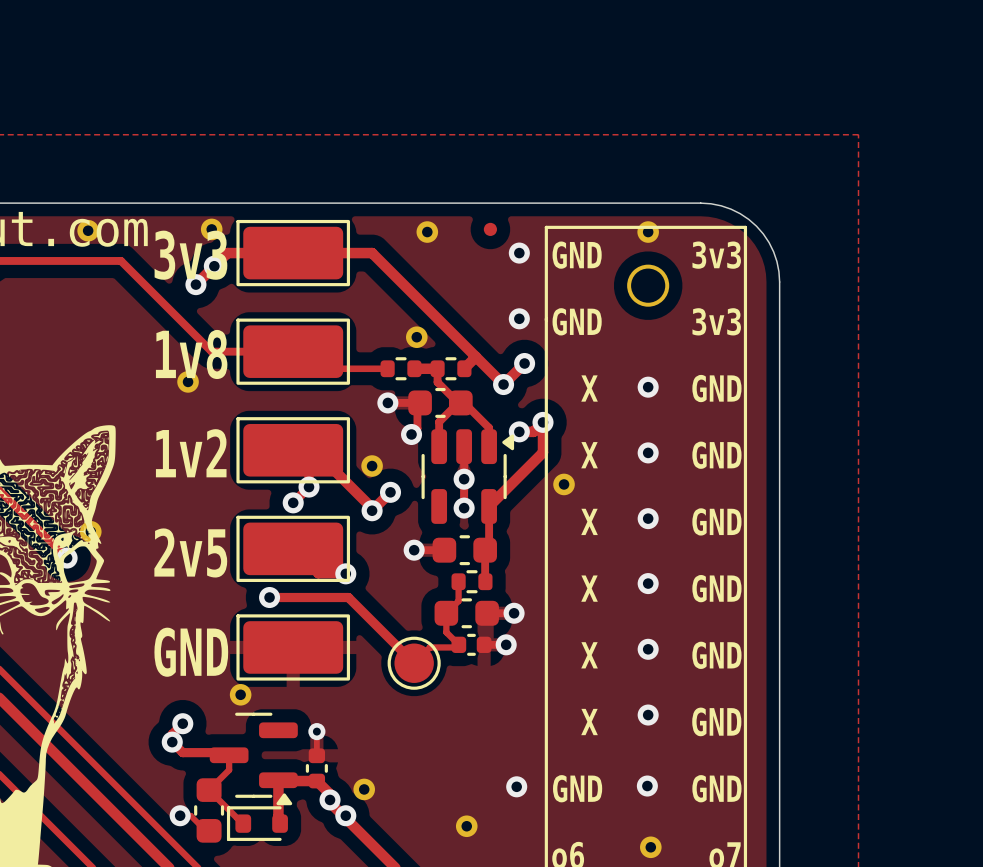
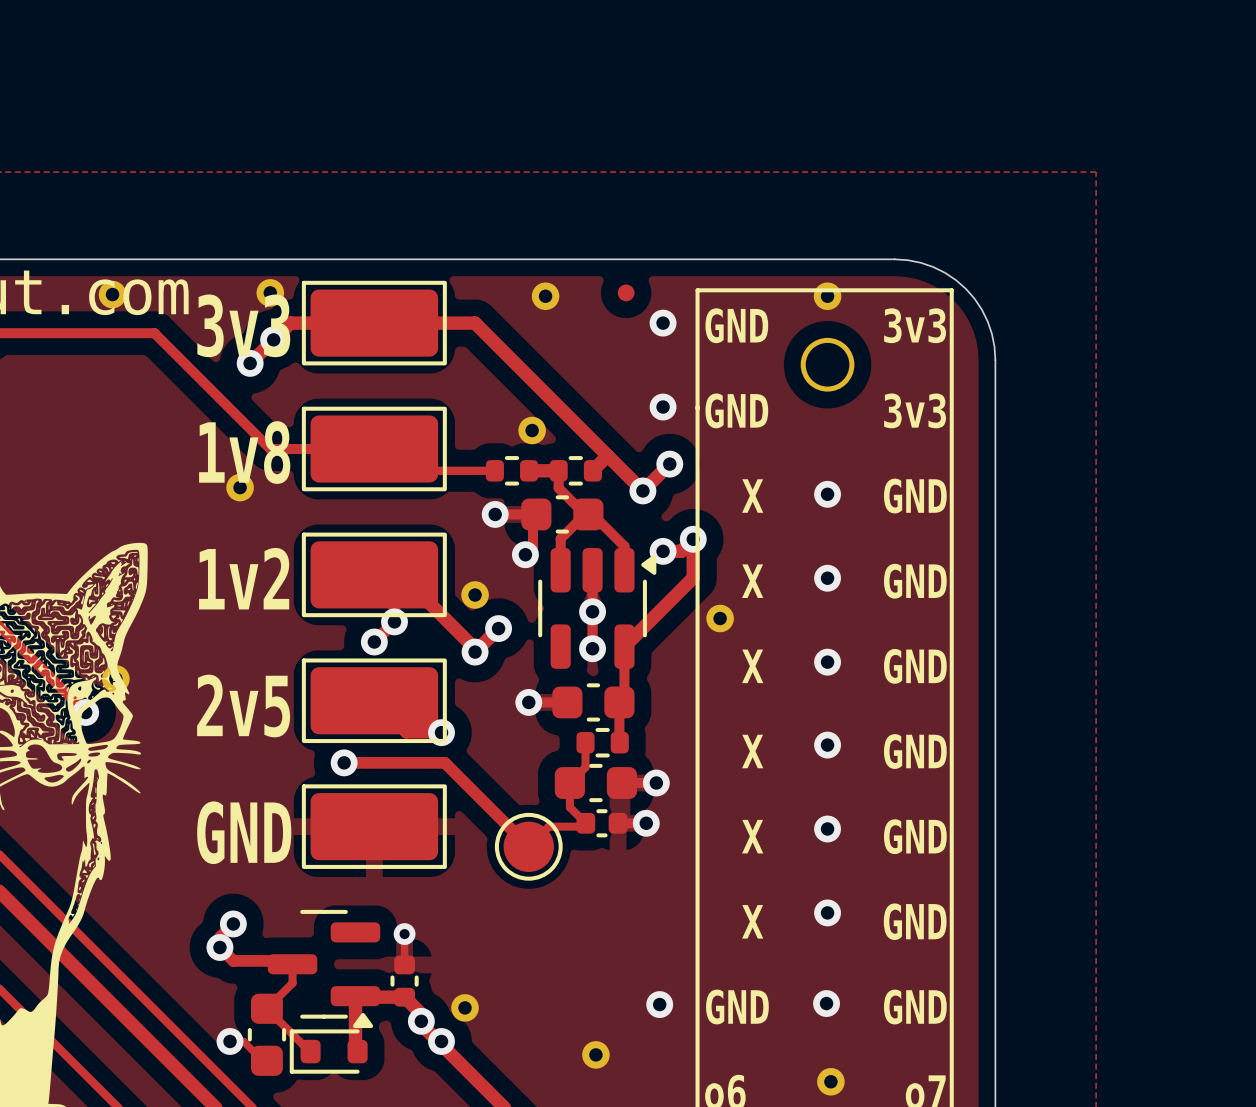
part: (240, 694) -> none

